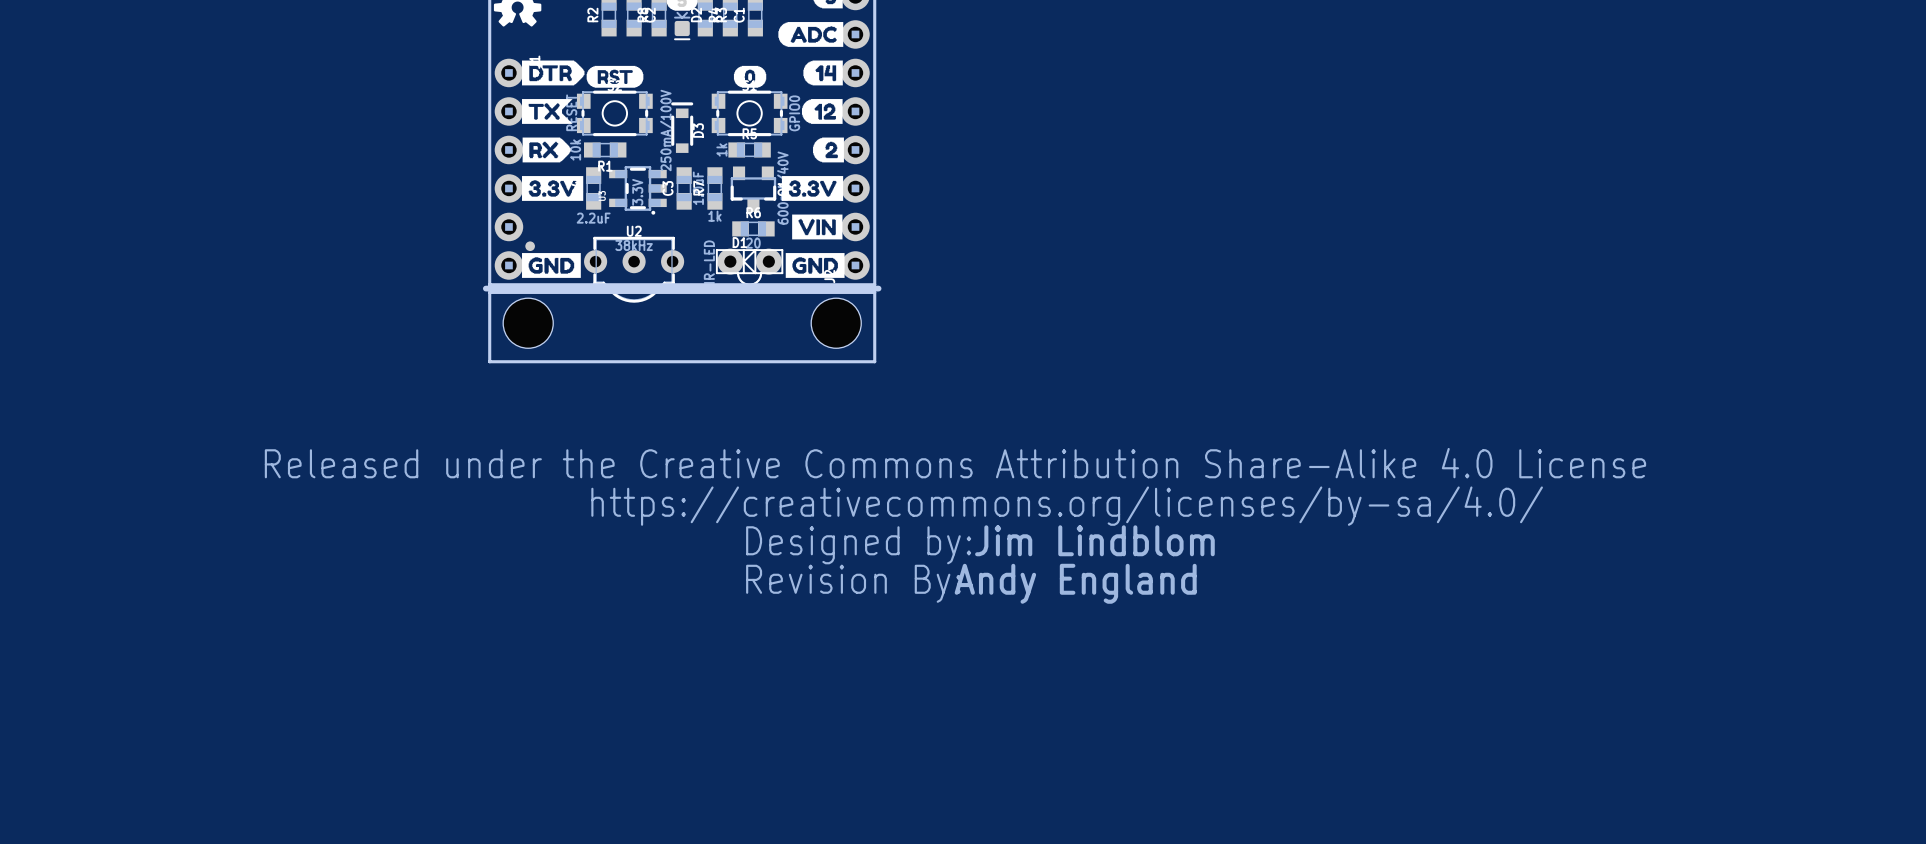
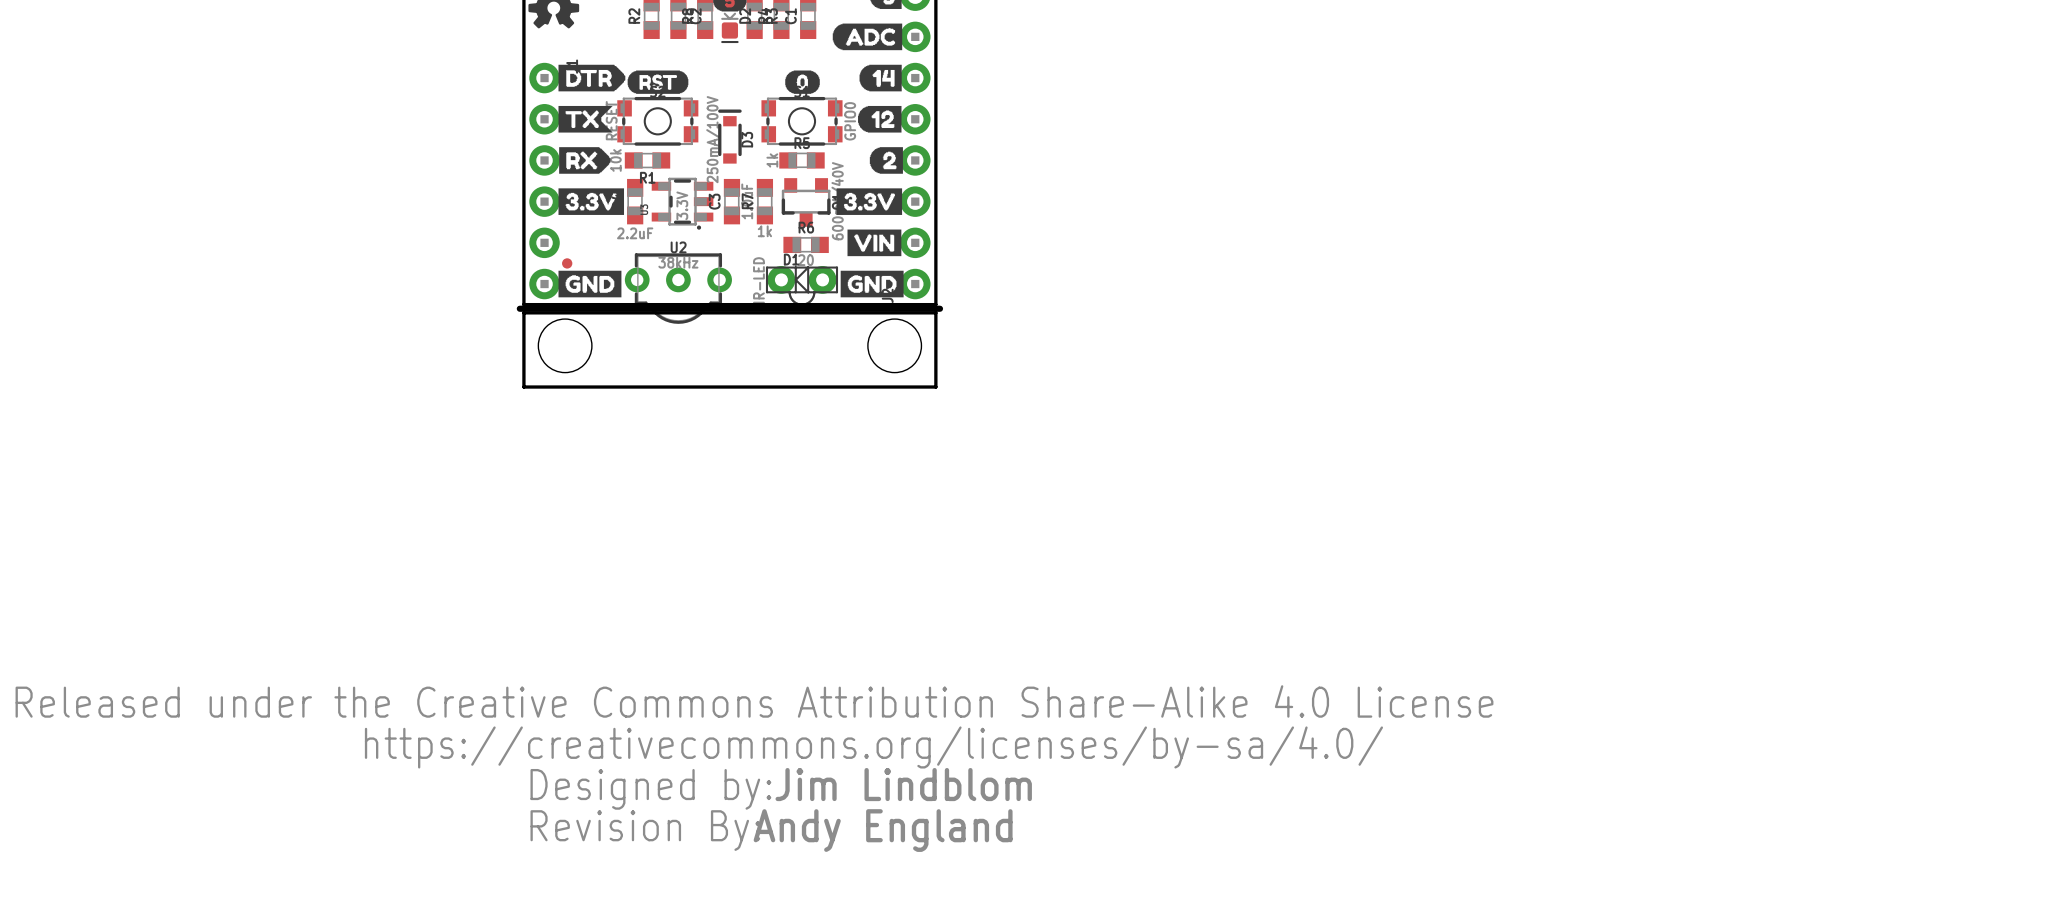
drawing position: (955, 506) -> (754, 747)
text position: Jim Lindblom (1094, 540) -> Jim Lindblom (903, 784)
drawing position: (853, 583) -> (645, 830)
text position: Andy England (1075, 583) -> Andy England (883, 830)

